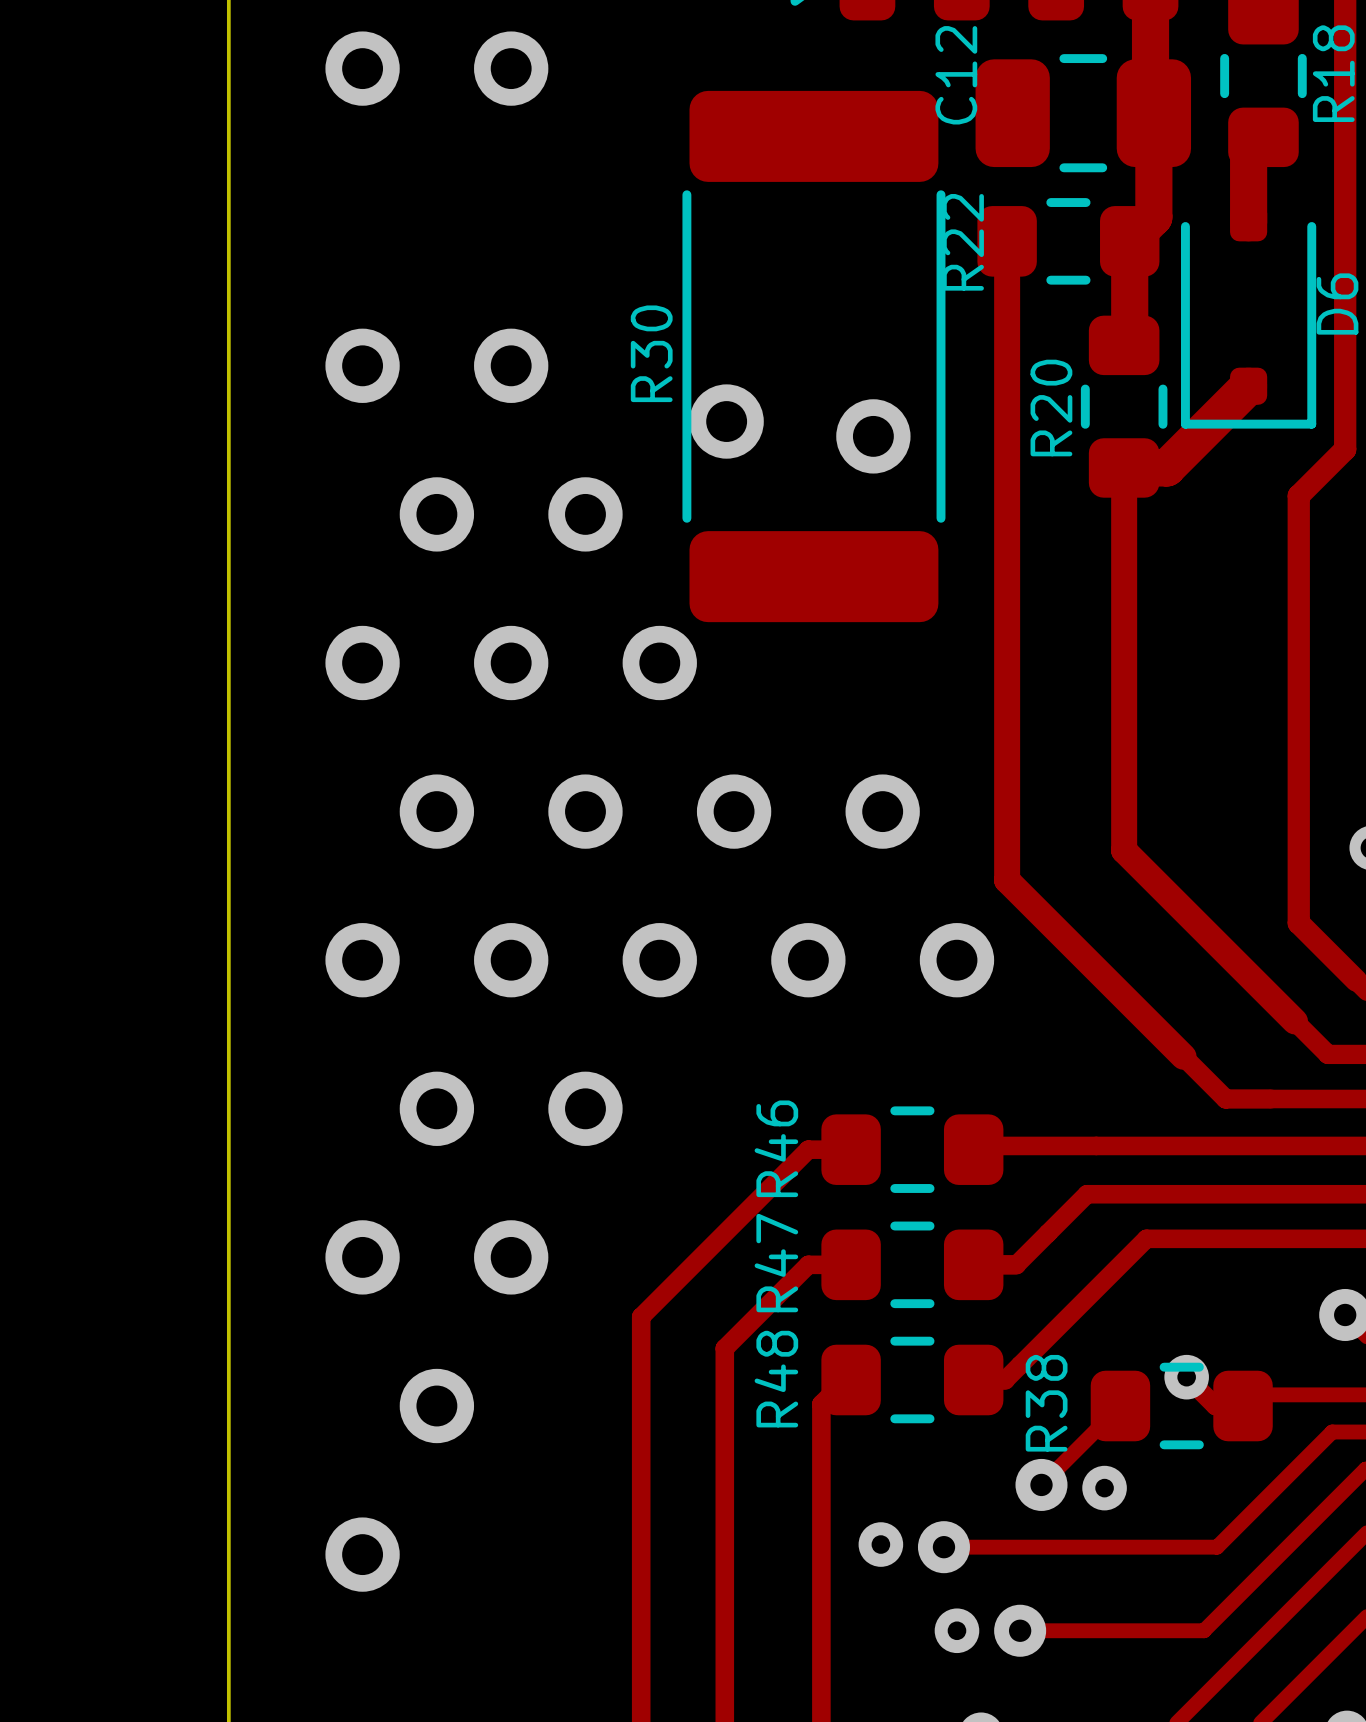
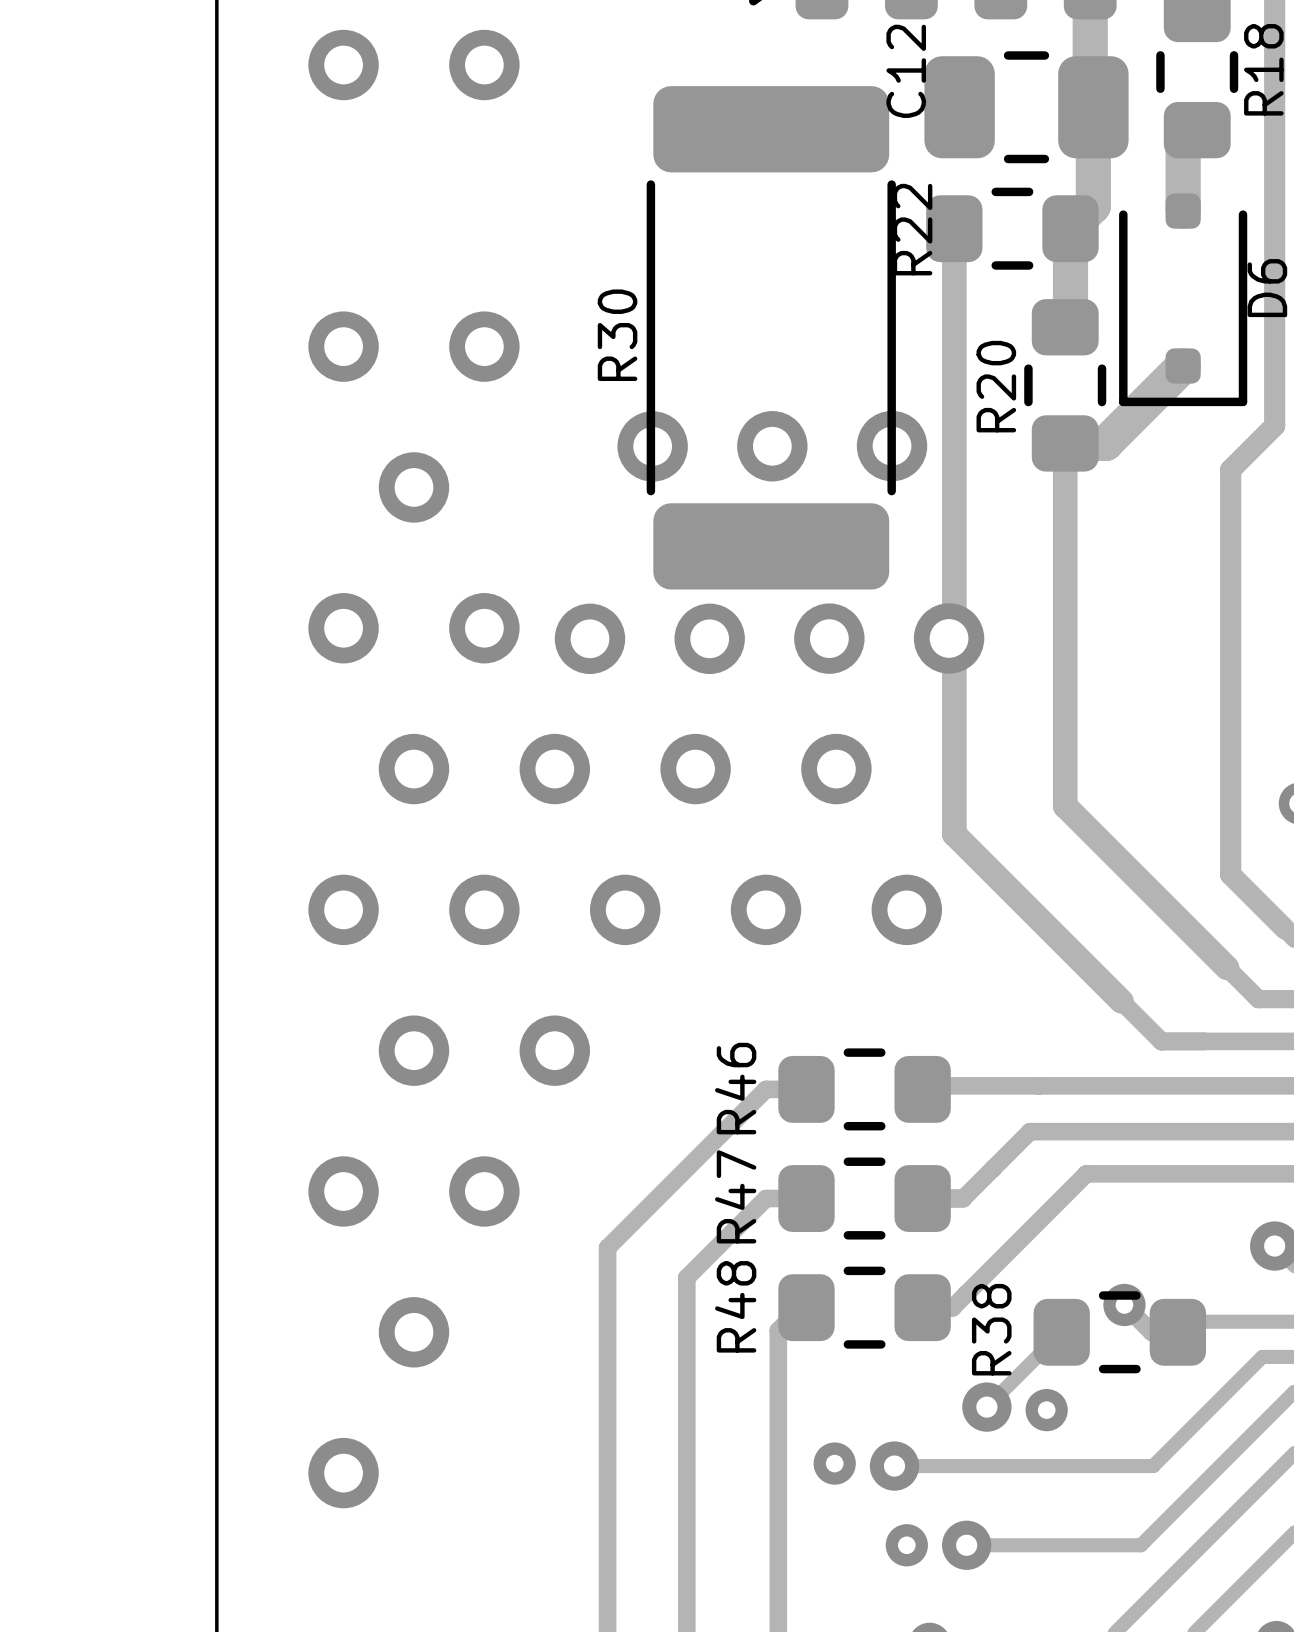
via position: (726, 421) -> (652, 446)
via: (873, 436) -> none
via: none -> (772, 446)
via: none -> (892, 446)
via: (585, 514) -> none
via position: (659, 663) -> (589, 638)
via: none -> (829, 638)
via: none -> (949, 638)
via: none -> (709, 638)

